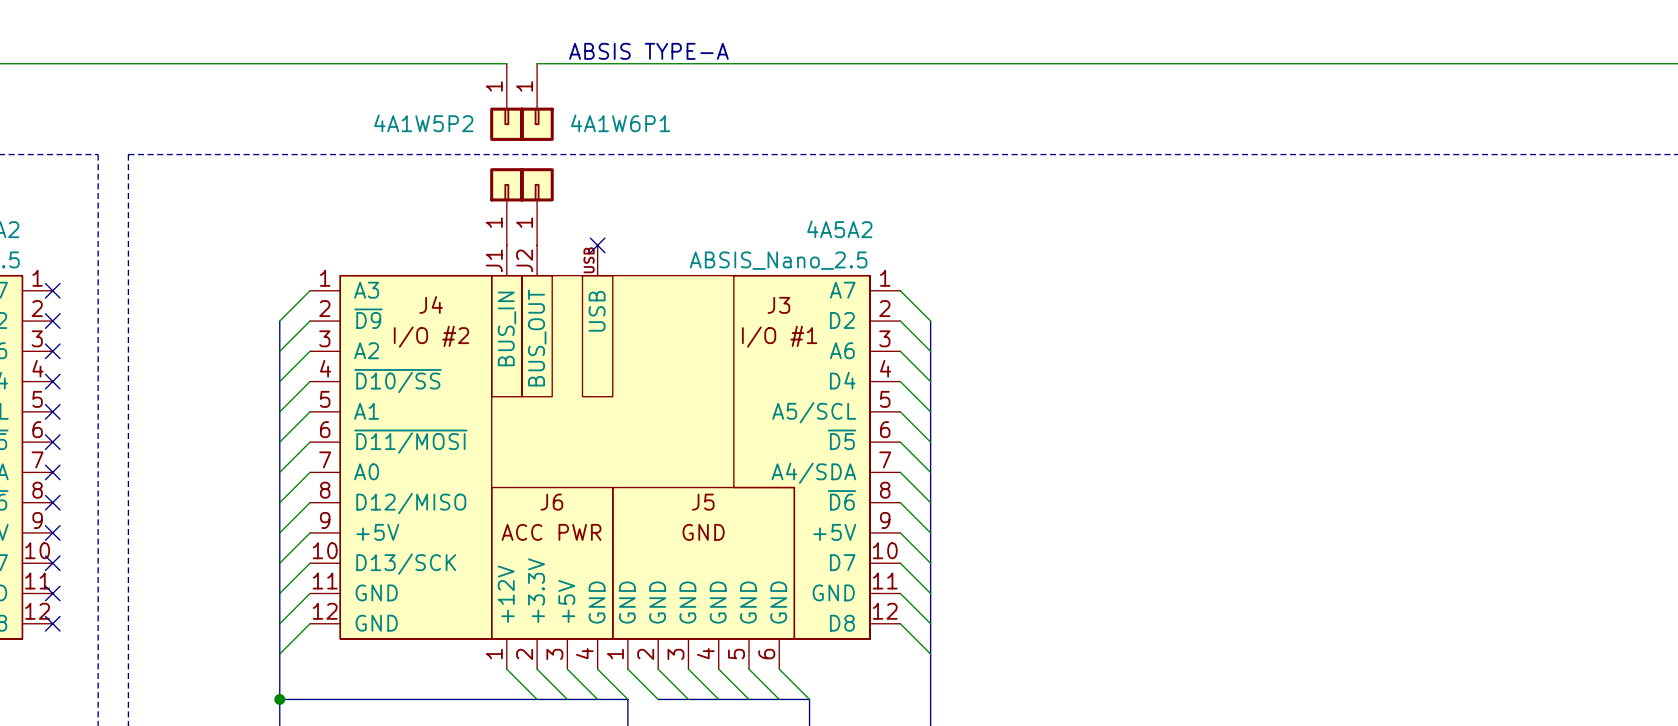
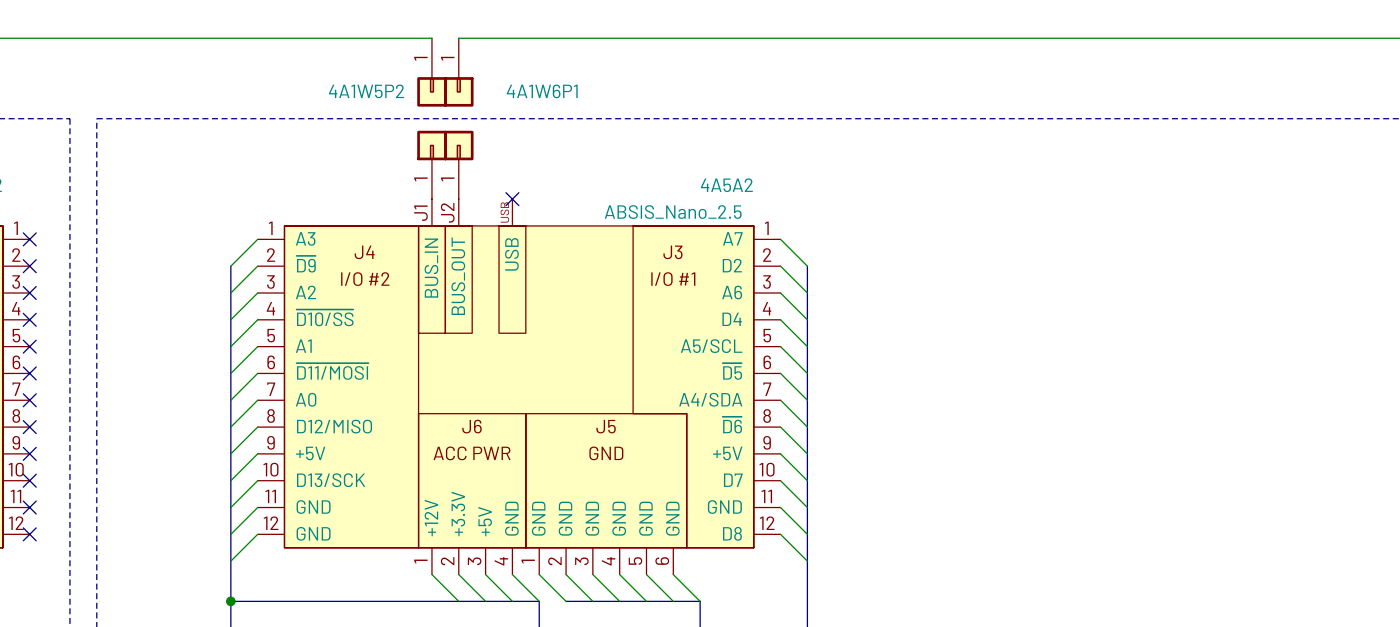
text: ABSIS TYPE-A (648, 51) -> none

